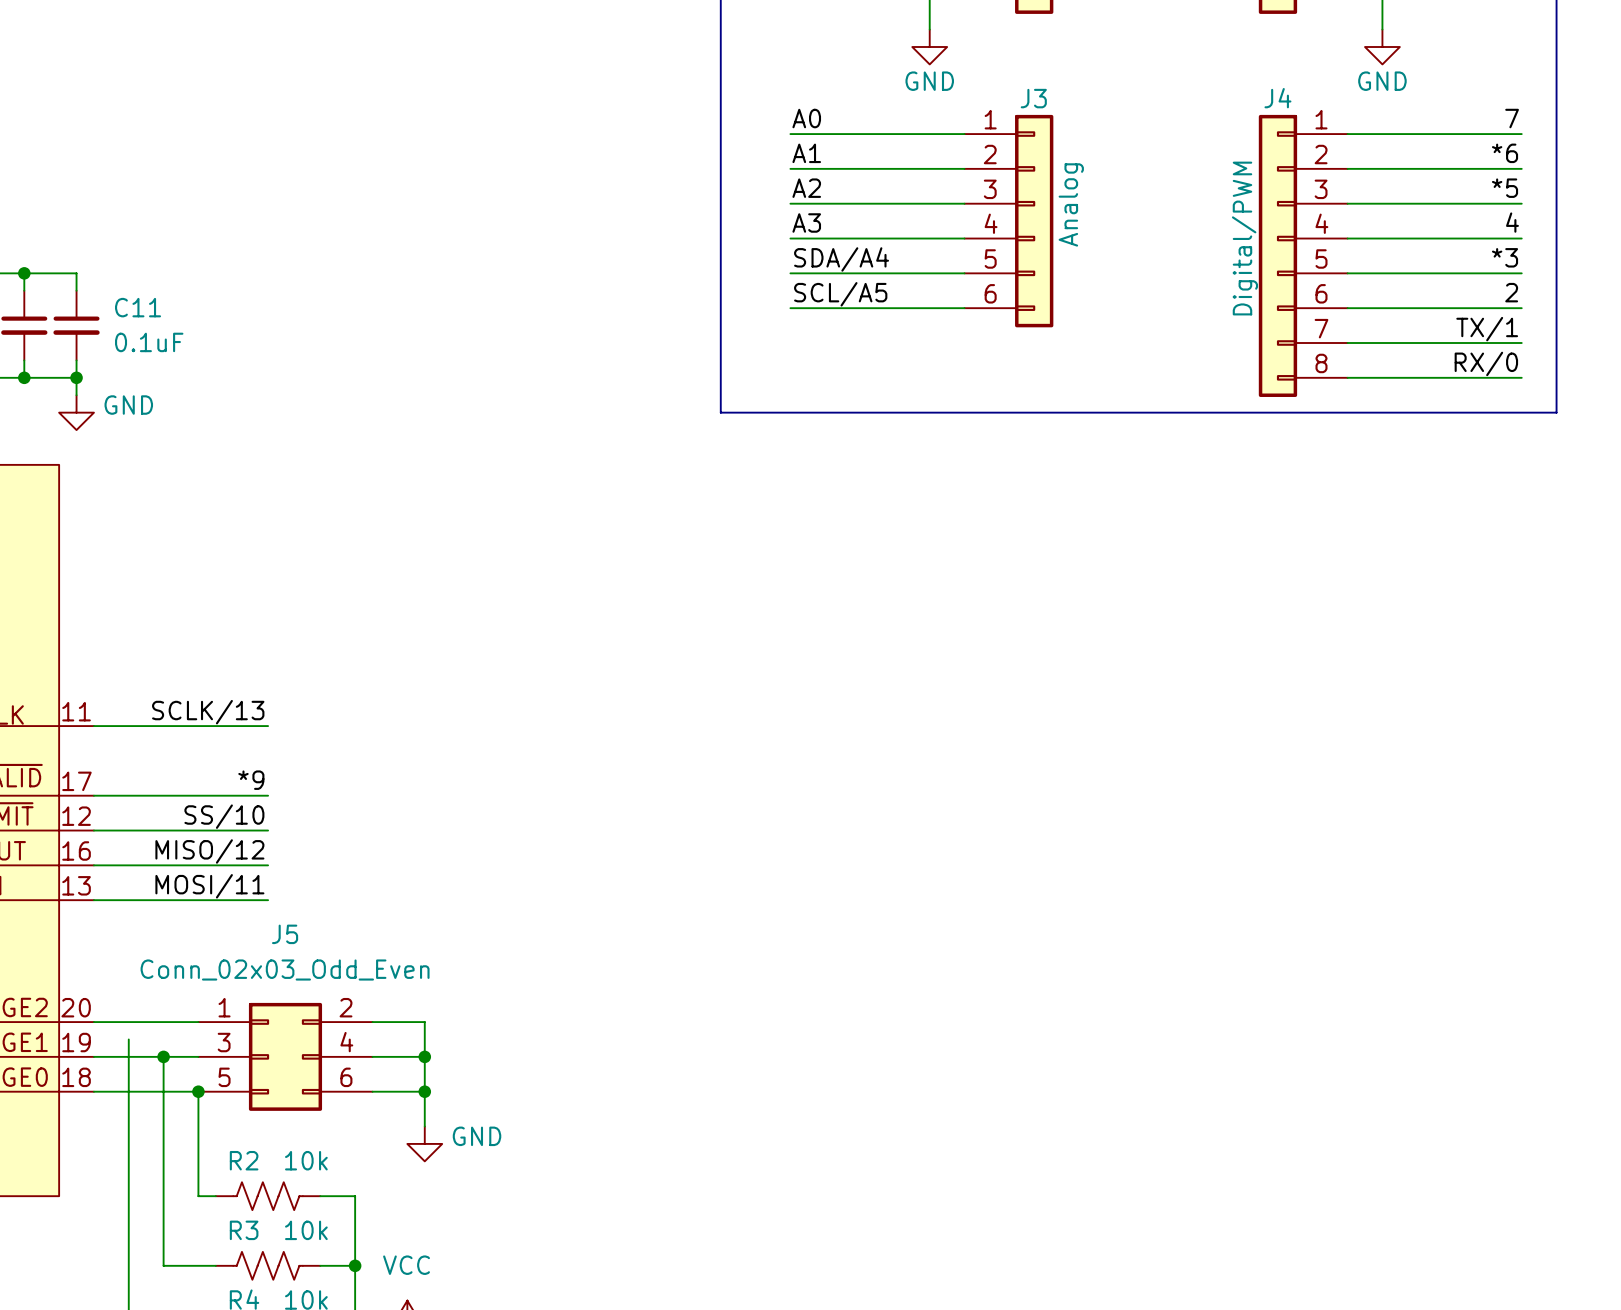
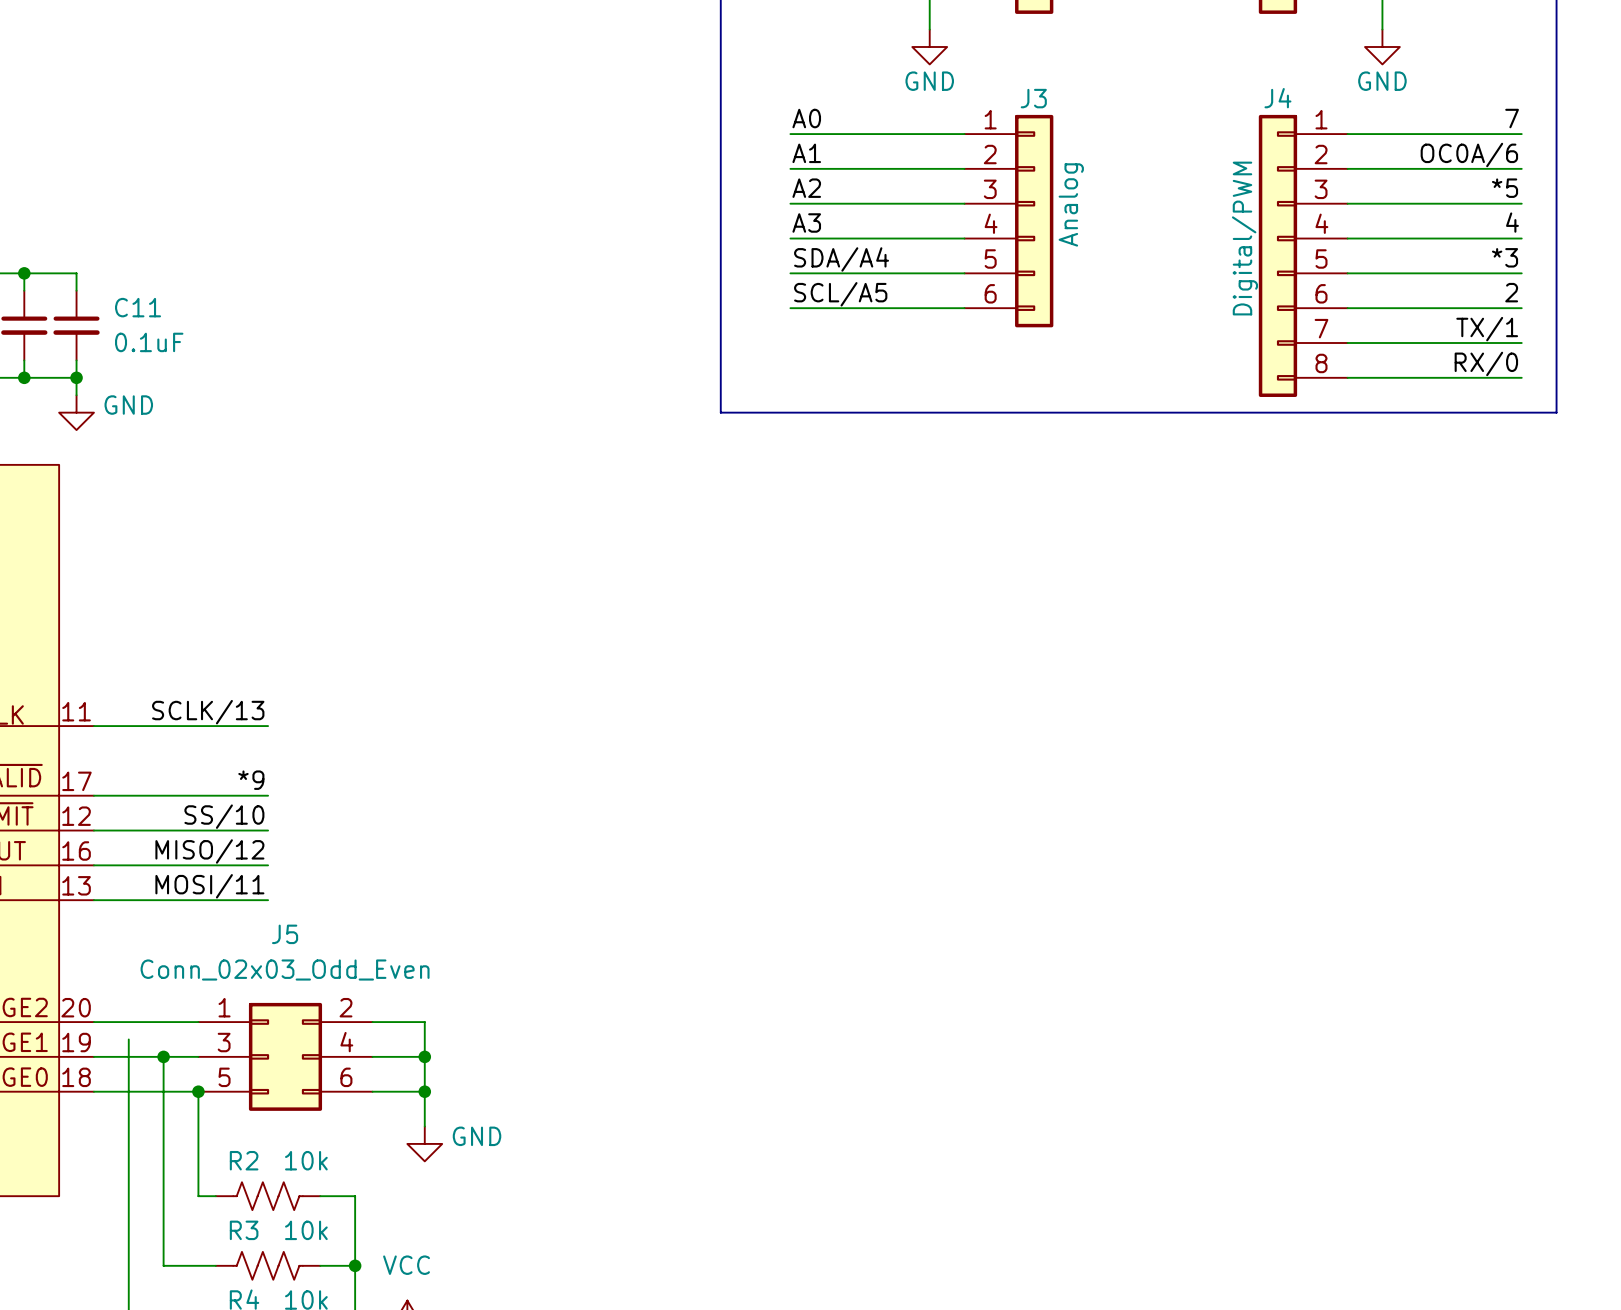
label: *6 (1505, 153) -> OC0A/6 (1469, 155)

